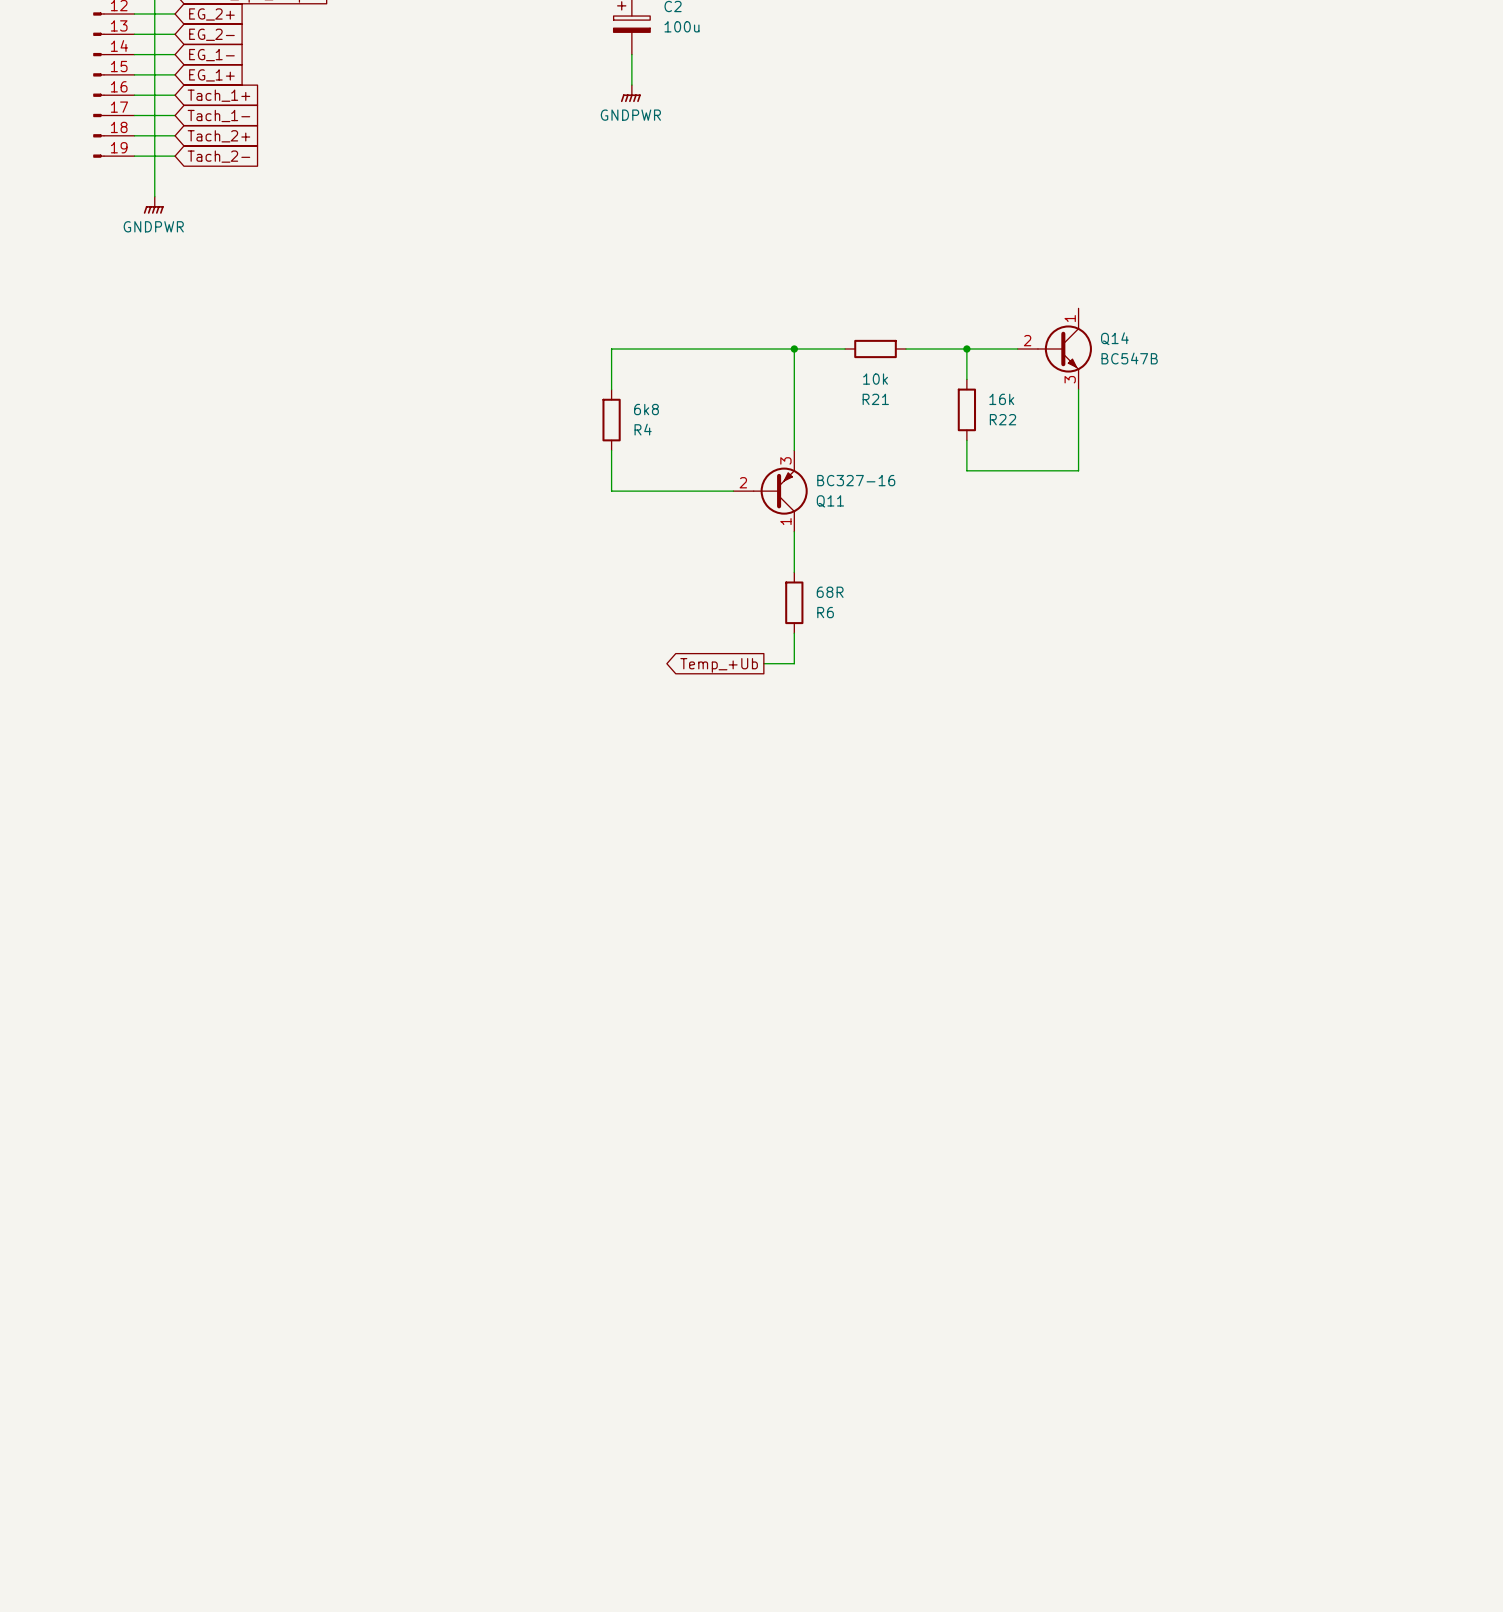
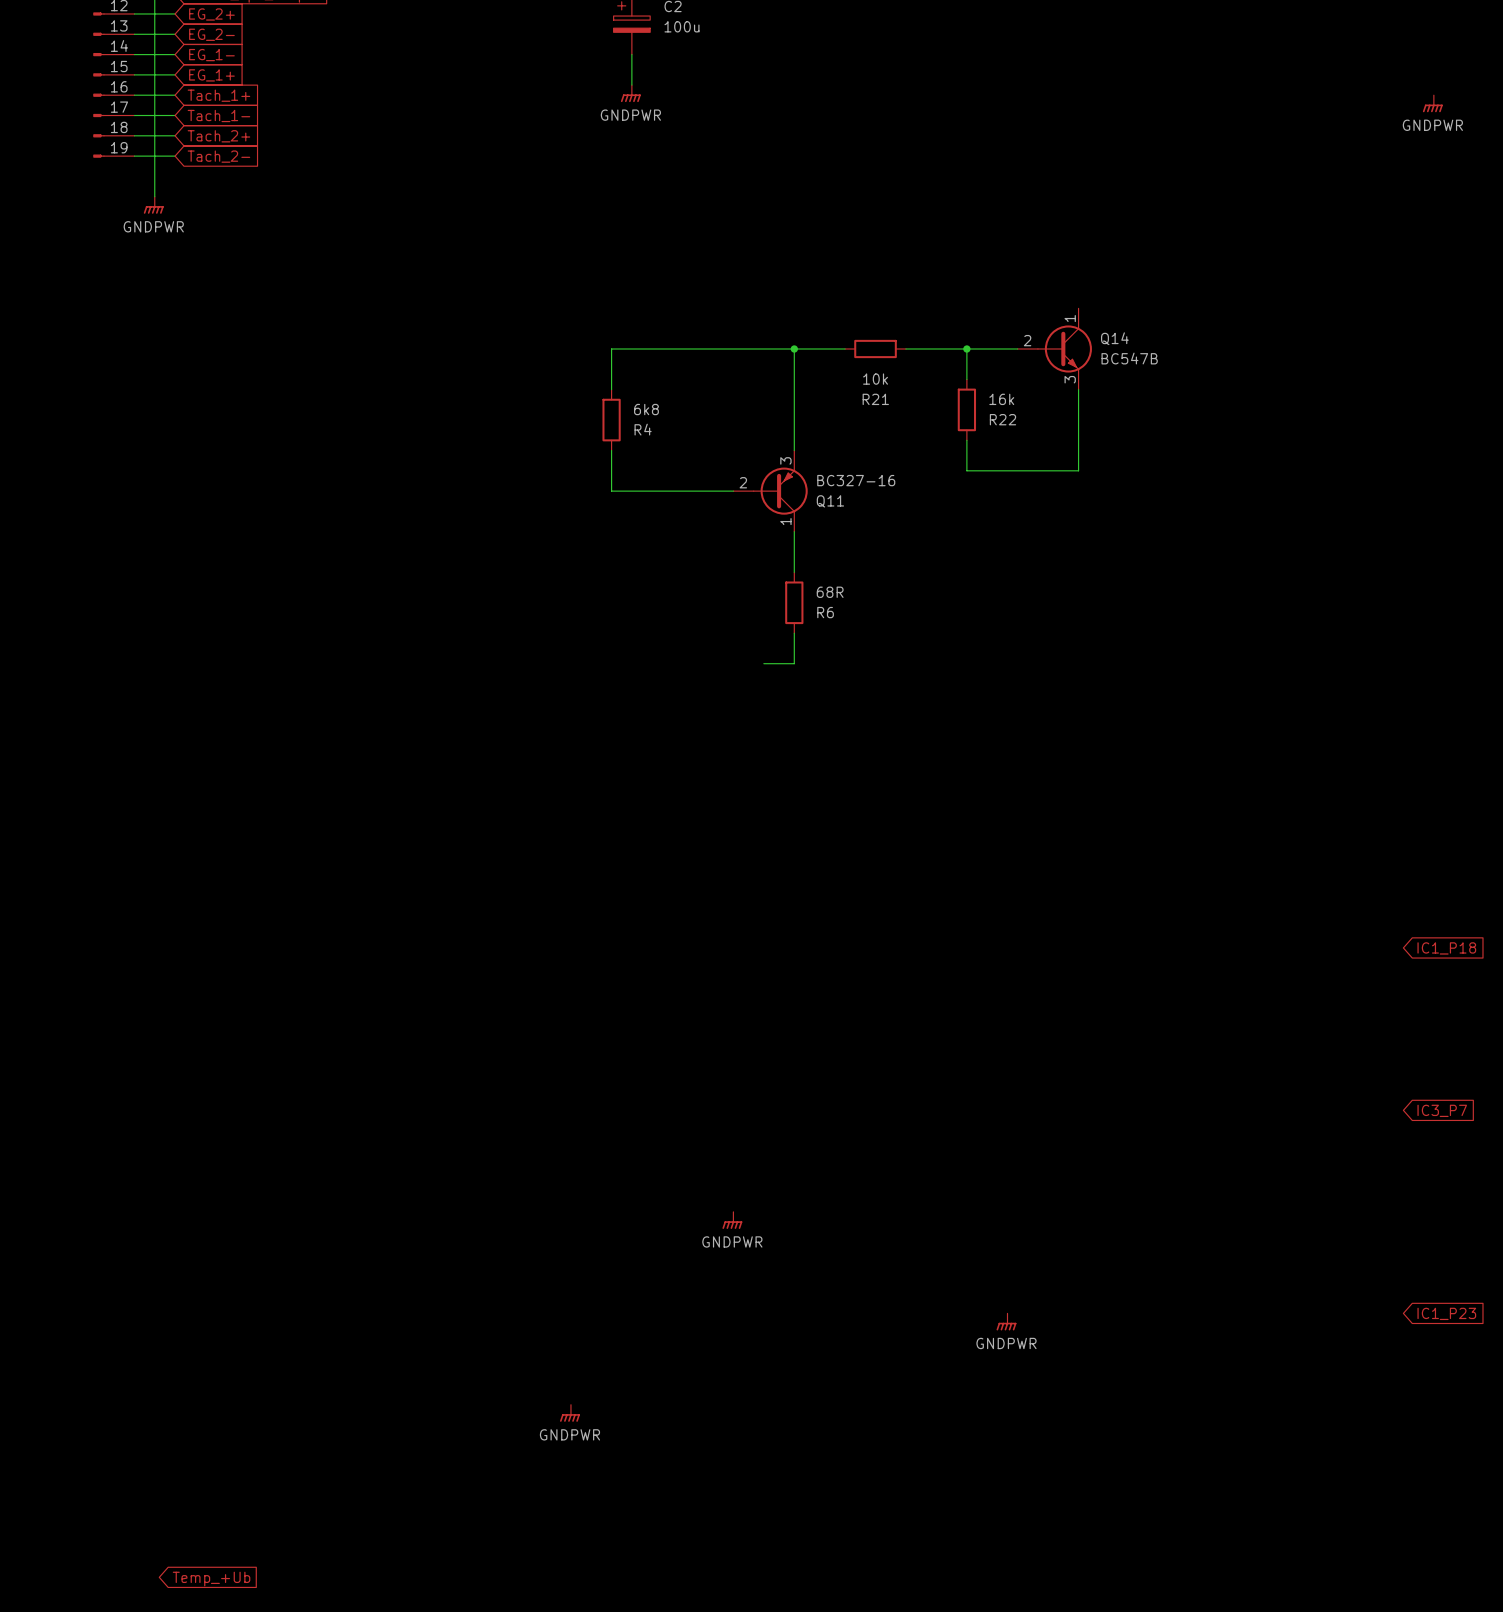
power symbol: none -> GNDPWR (1432, 103)
global label: Temp_+Ub (719, 665) -> none
global label: none -> IC1_P18 (1446, 948)
global label: none -> IC3_P7 (1442, 1110)
power symbol: none -> GNDPWR (732, 1220)
global label: none -> IC1_P23 (1446, 1313)
power symbol: none -> GNDPWR (1006, 1321)
power symbol: none -> GNDPWR (569, 1413)
global label: none -> Temp_+Ub (211, 1579)

